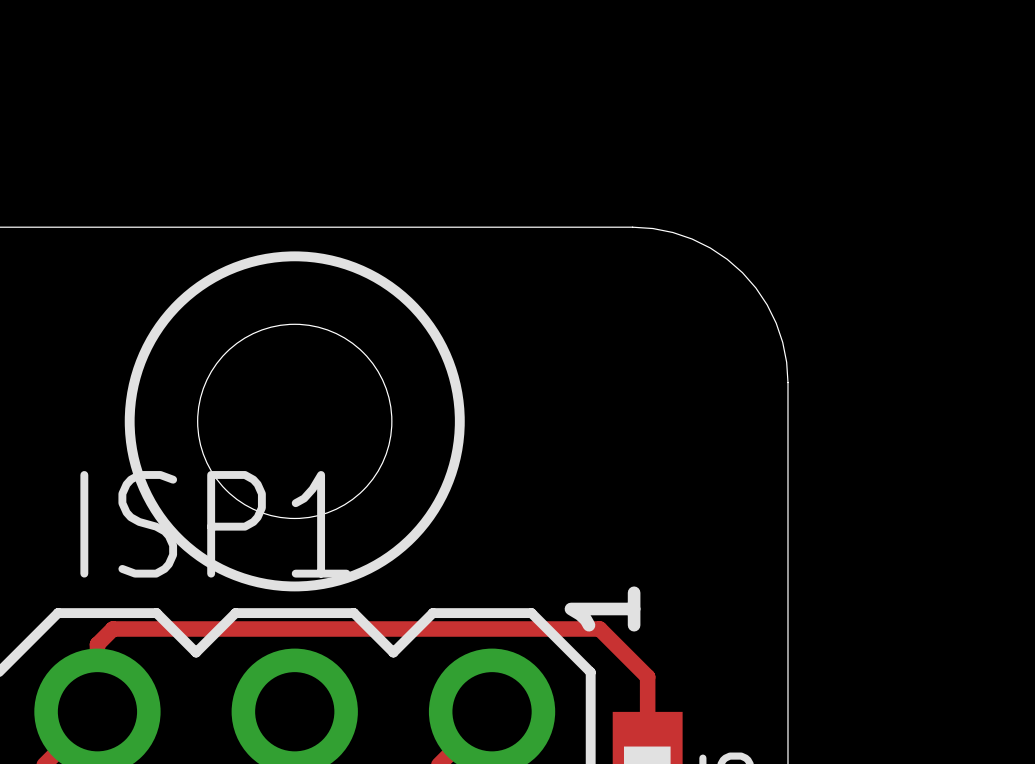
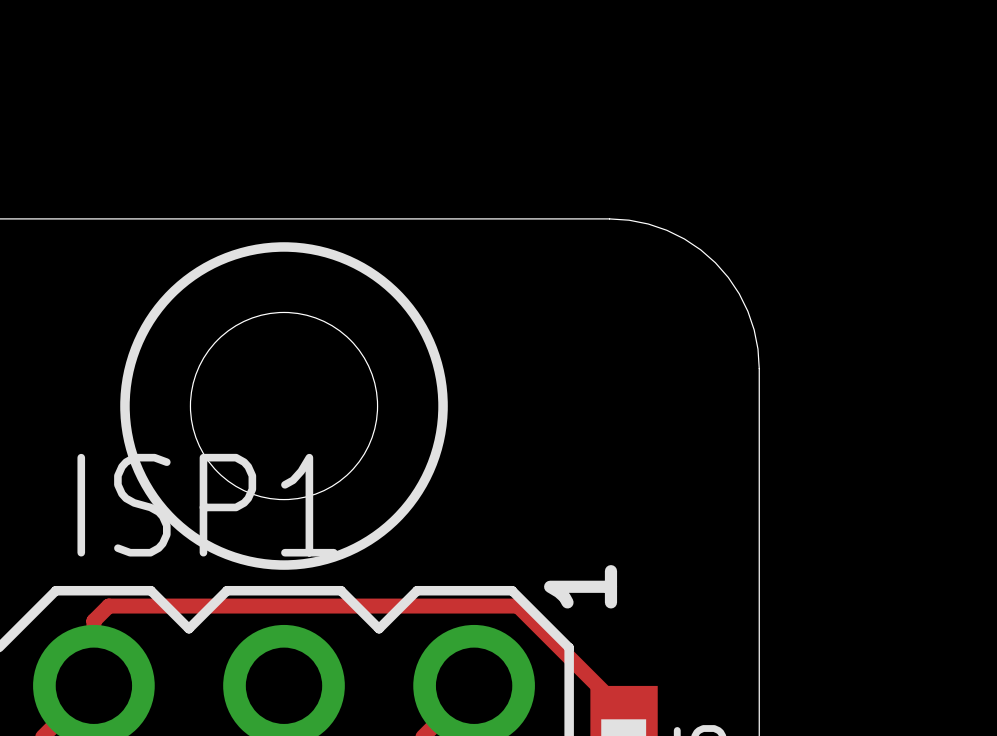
track: (537, 628) (599, 628) (647, 676) (647, 739) -> (517, 606) (624, 712)

